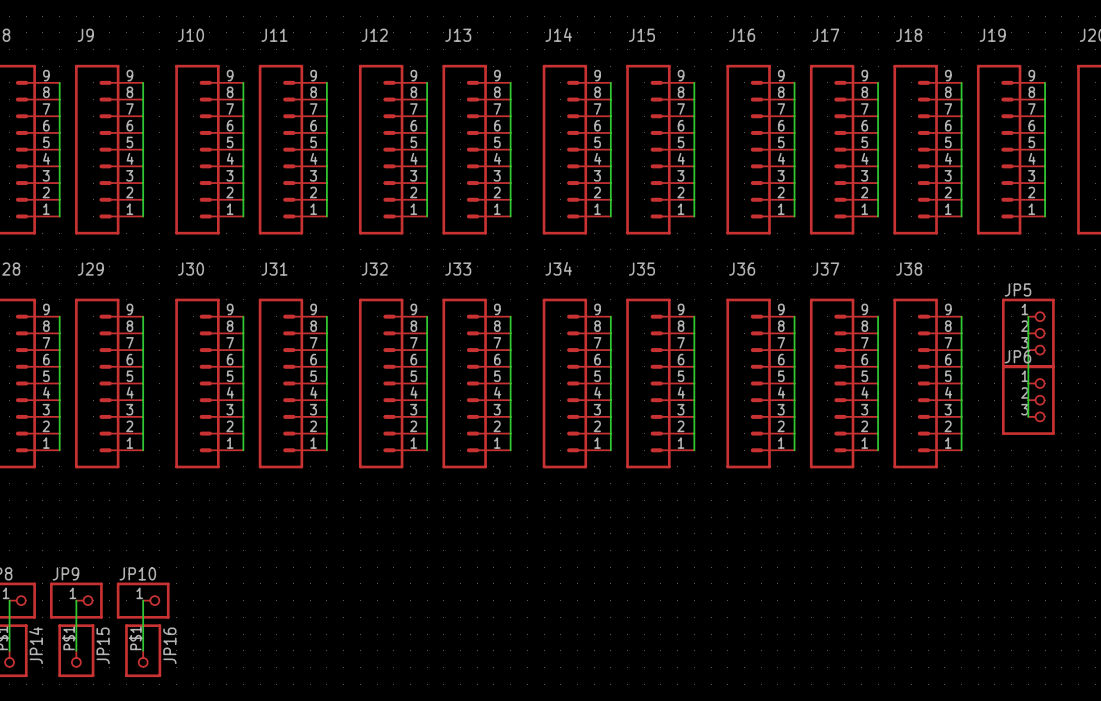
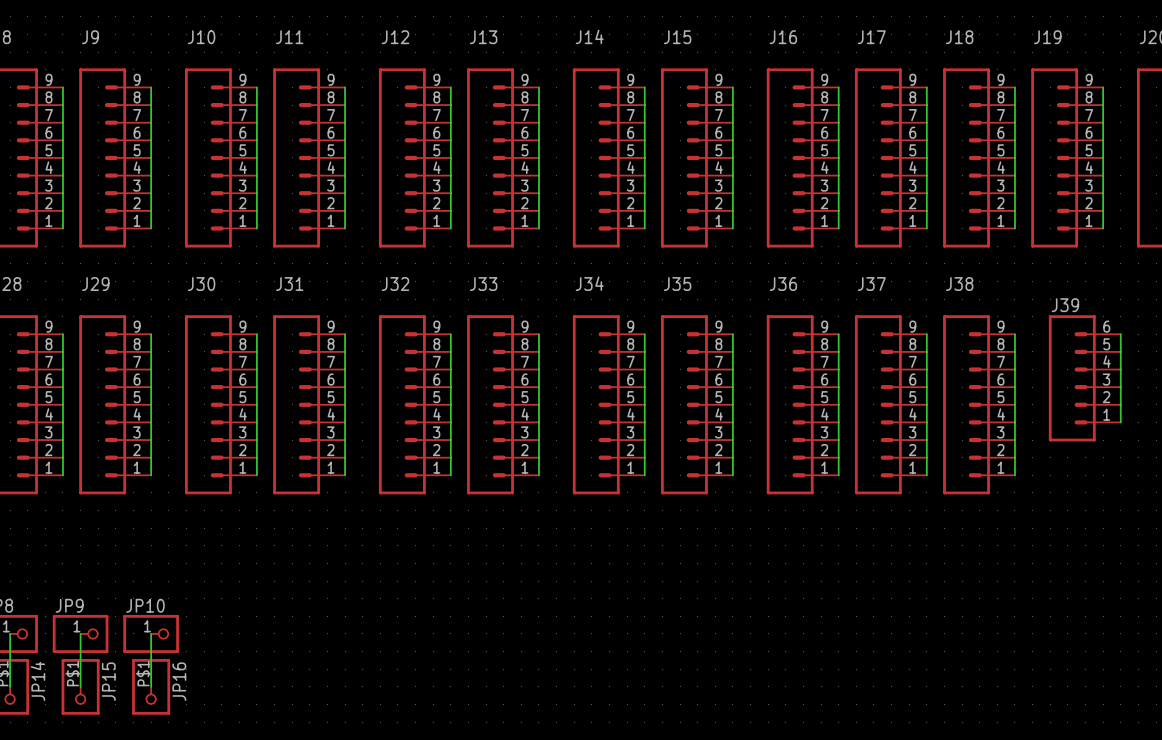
wire: (1028, 316) (1028, 416) -> none
wire: none -> (1120, 334) (1120, 422)
JP5: (1028, 333) -> none
J39: none -> (1084, 378)
JP6: (1028, 400) -> none

